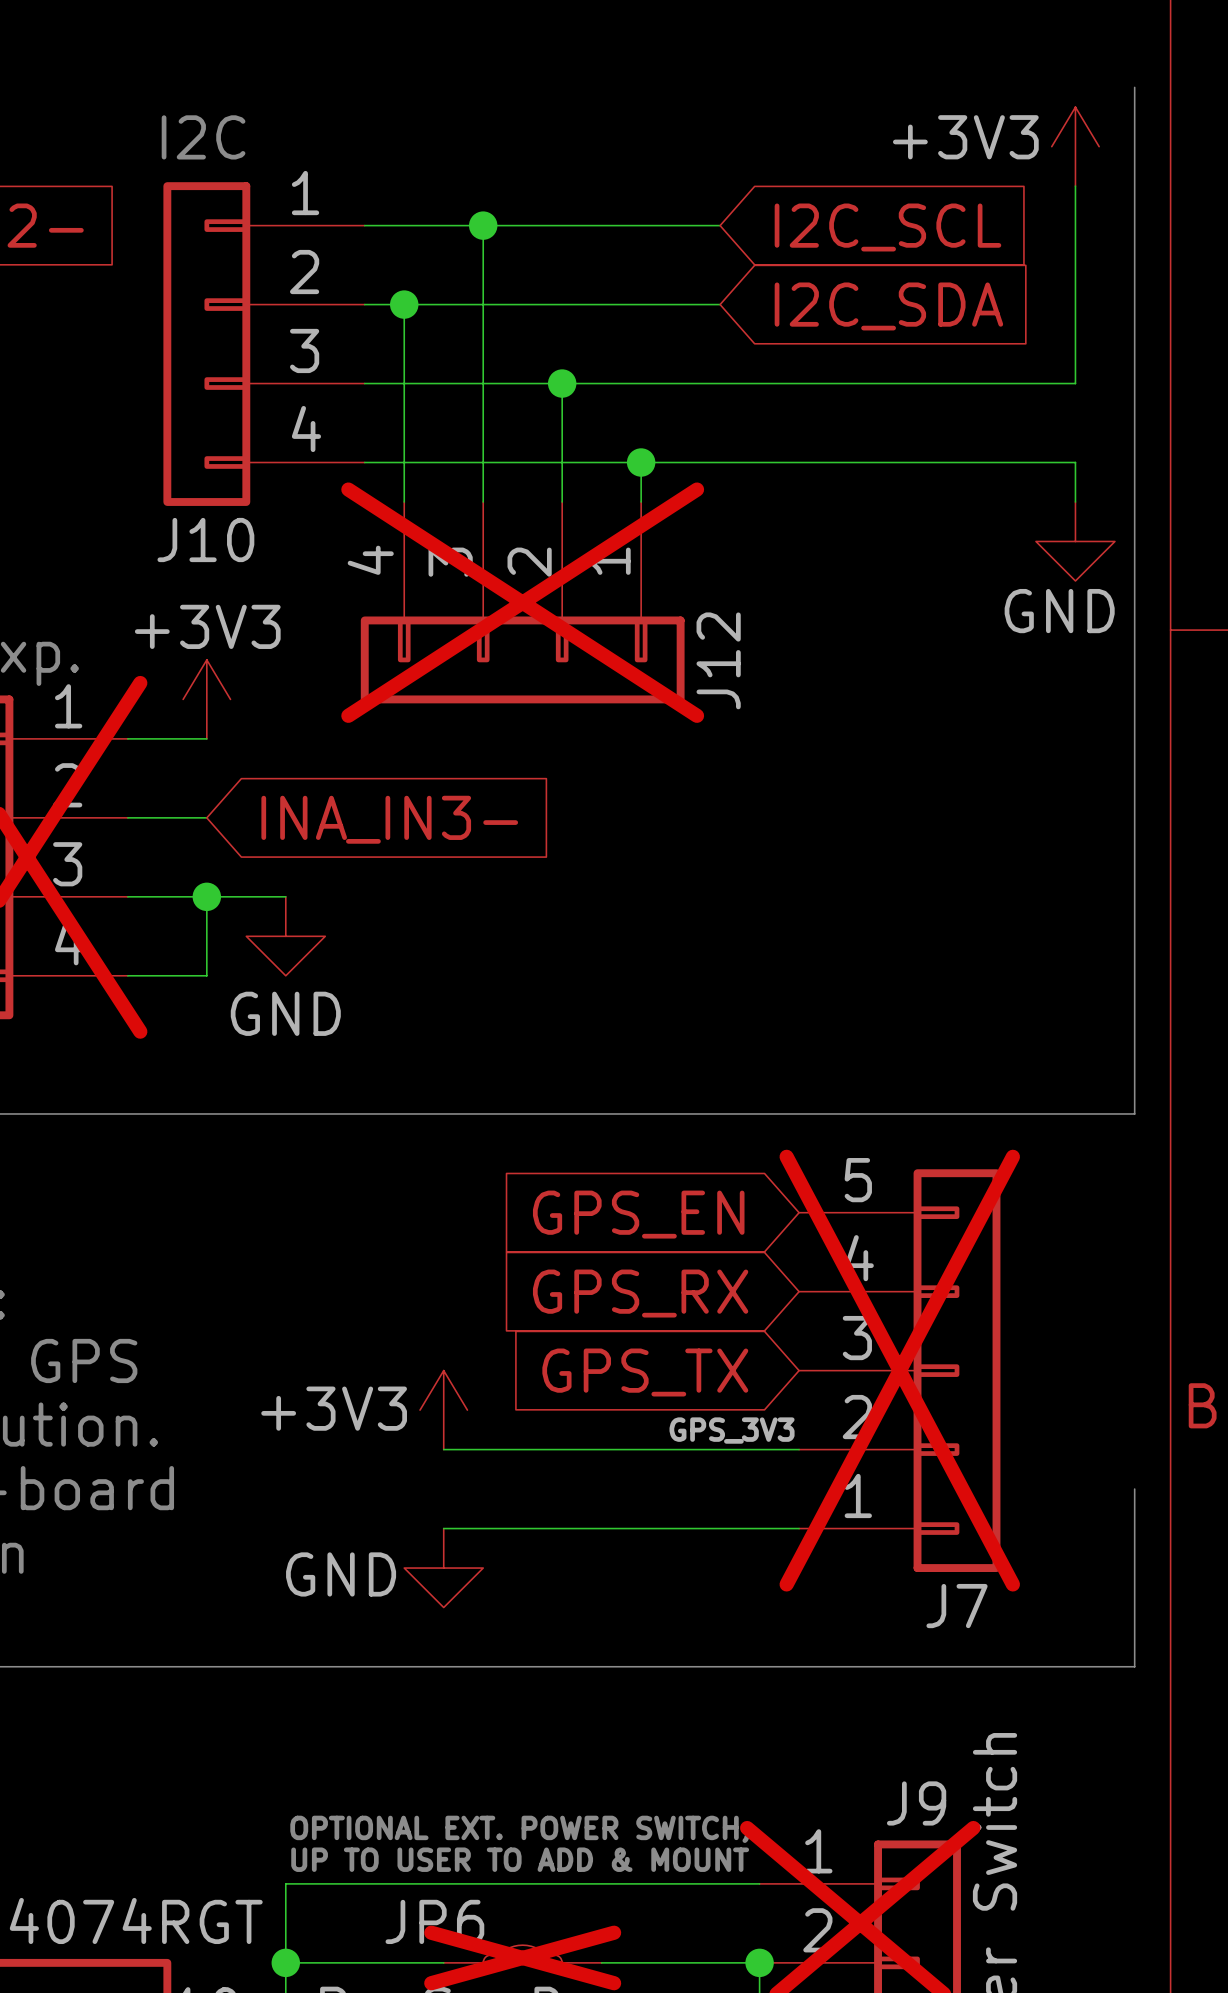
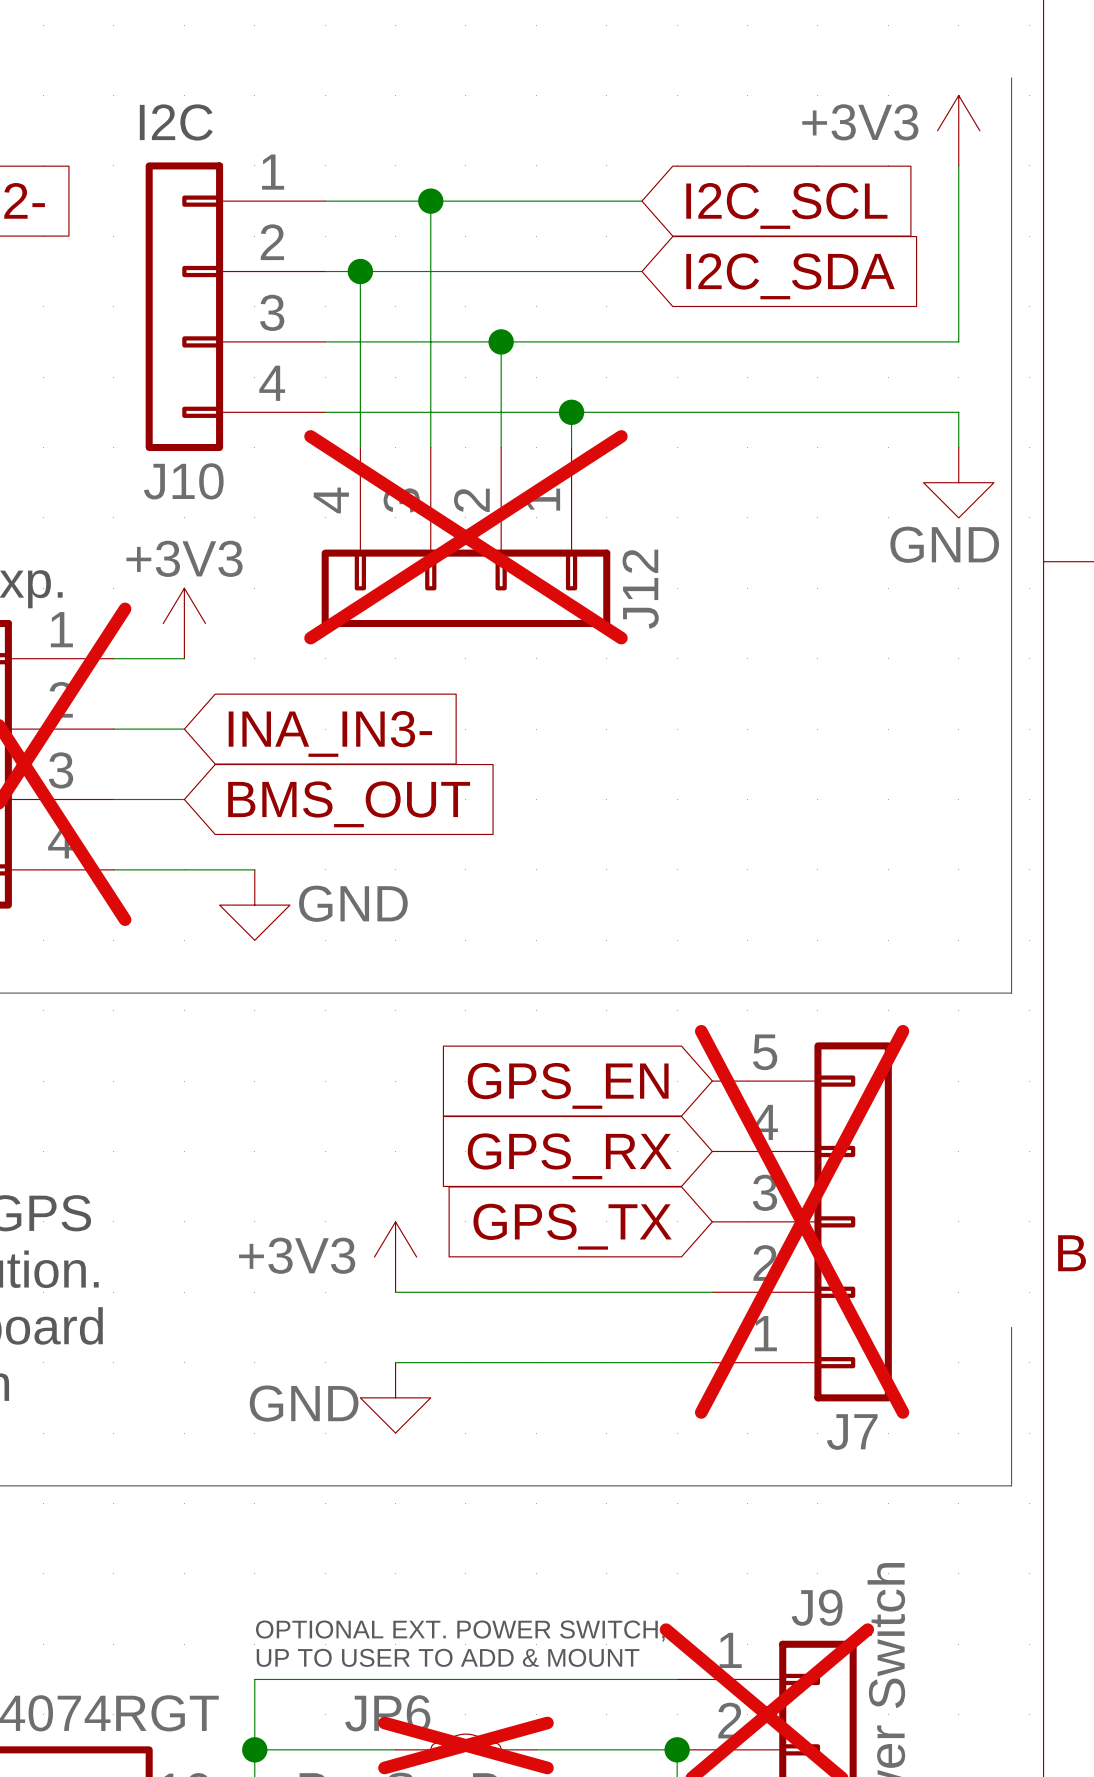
junction: (206, 896) -> none
wire: (285, 896) (206, 896) (206, 975) -> (254, 869) (184, 869)
global label: none -> BMS_OUT (349, 804)
power symbol position: GND (285, 936) -> GND (254, 905)
power symbol text position: GND (285, 1013) -> GND (353, 903)
label: GPS_3V3 (732, 1430) -> none

